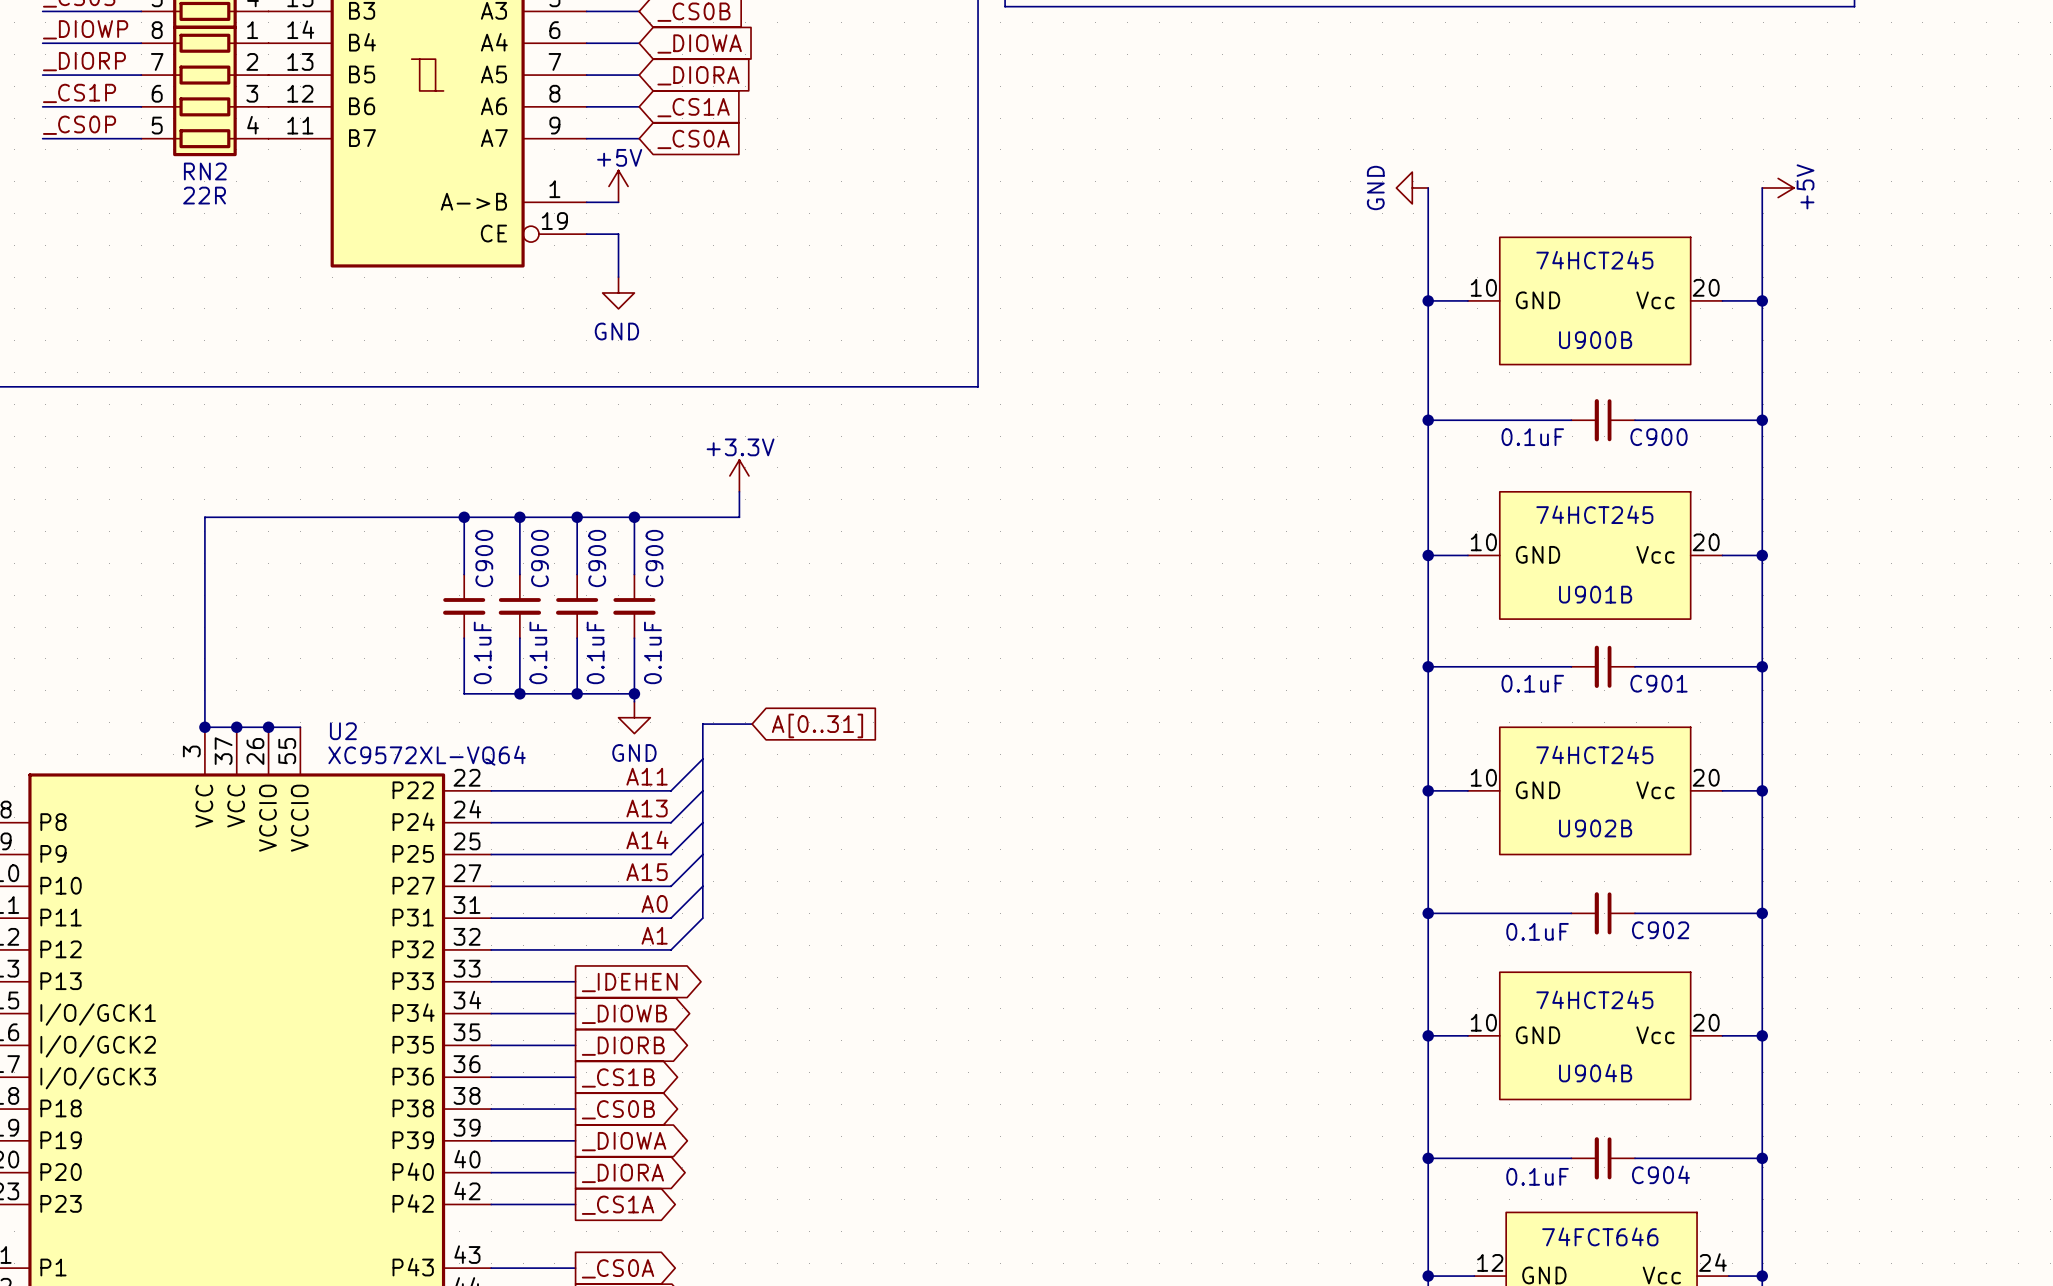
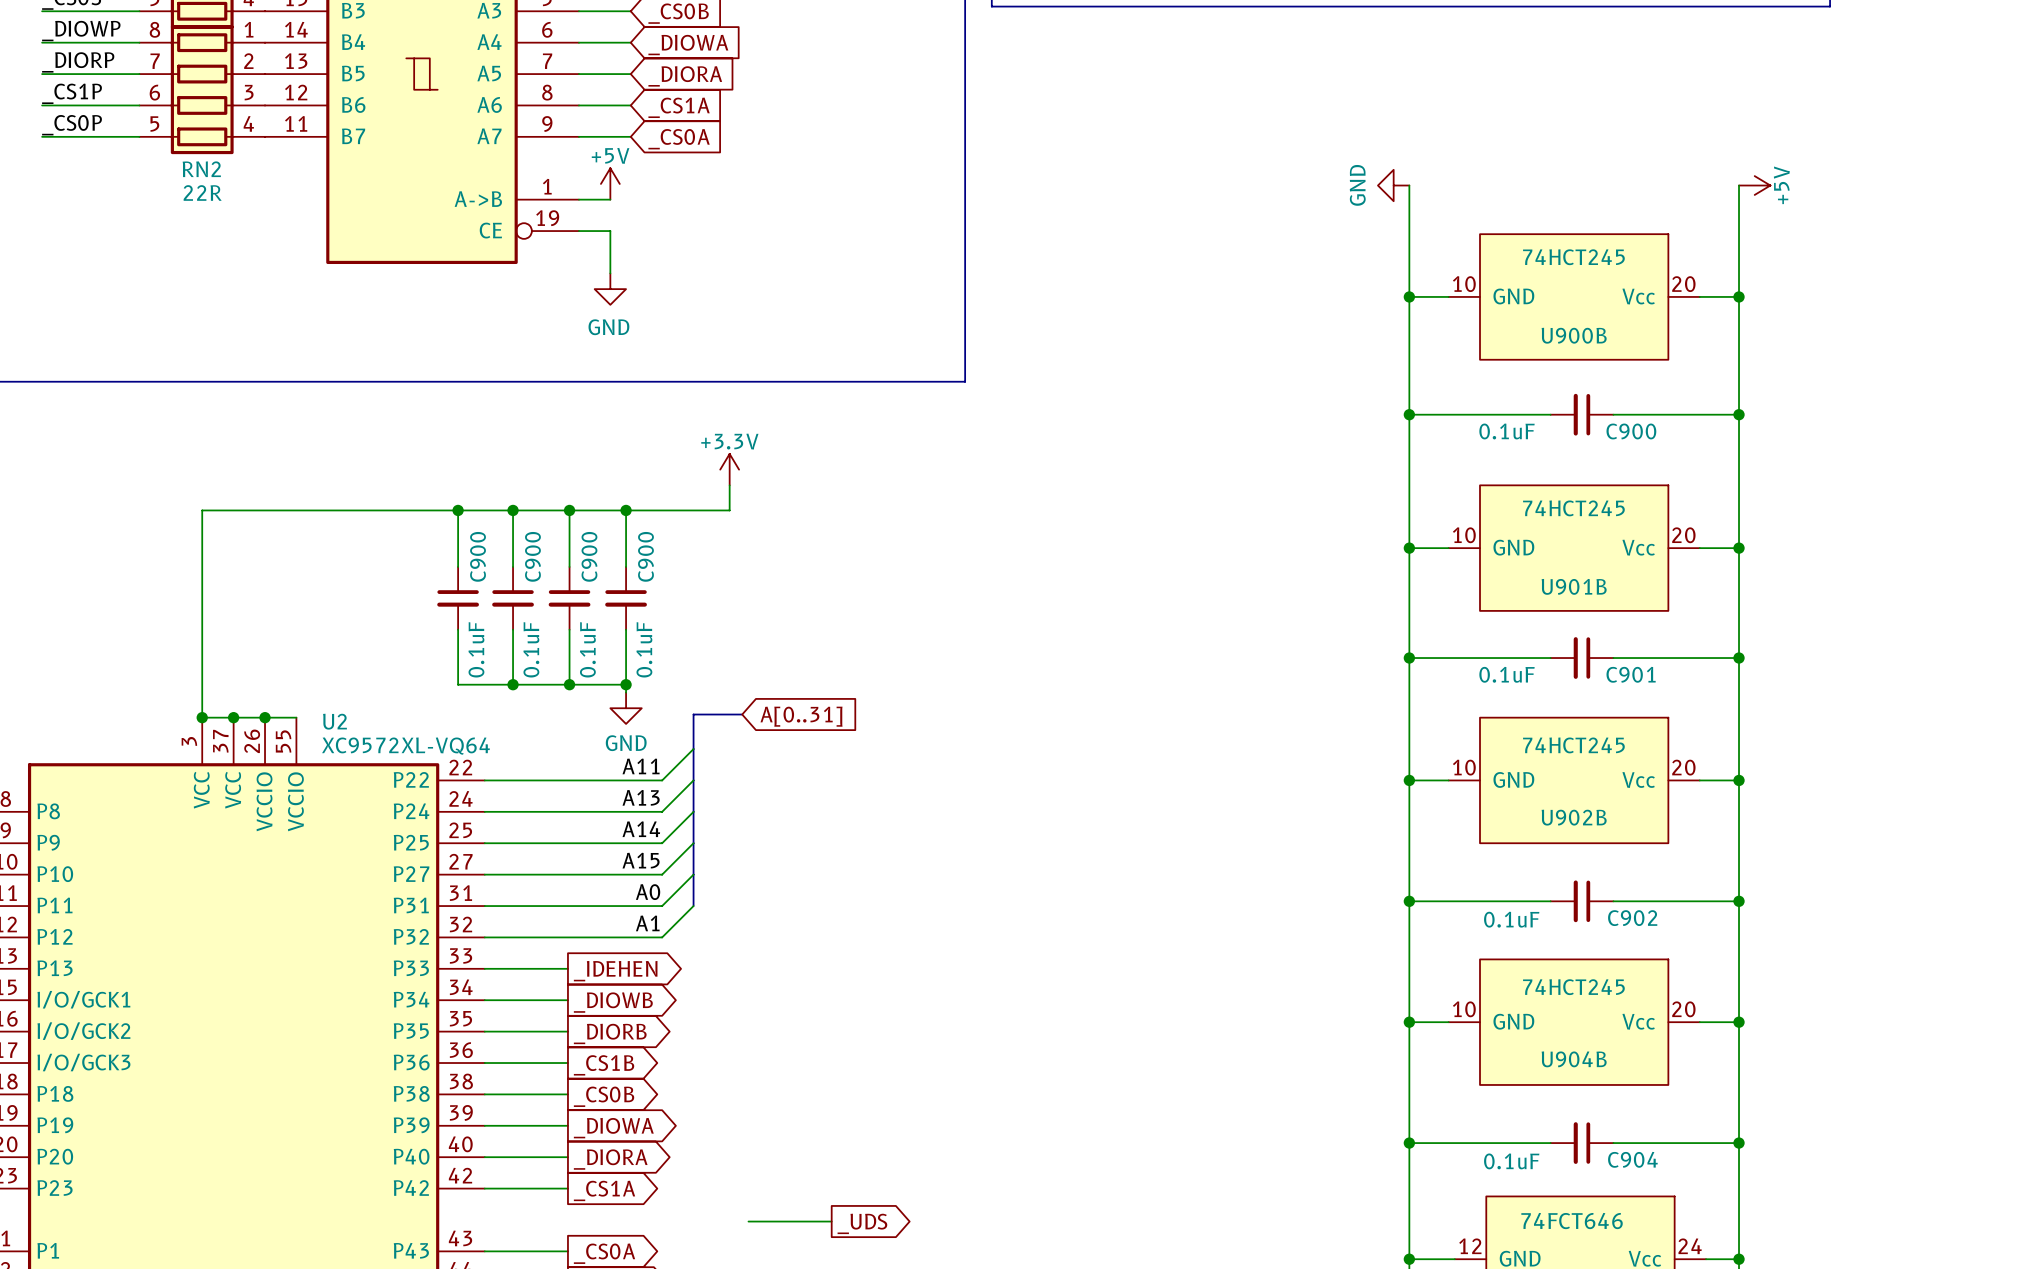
wire: none -> (748, 1221) (831, 1221)
global label: none -> _UDS (862, 1223)

